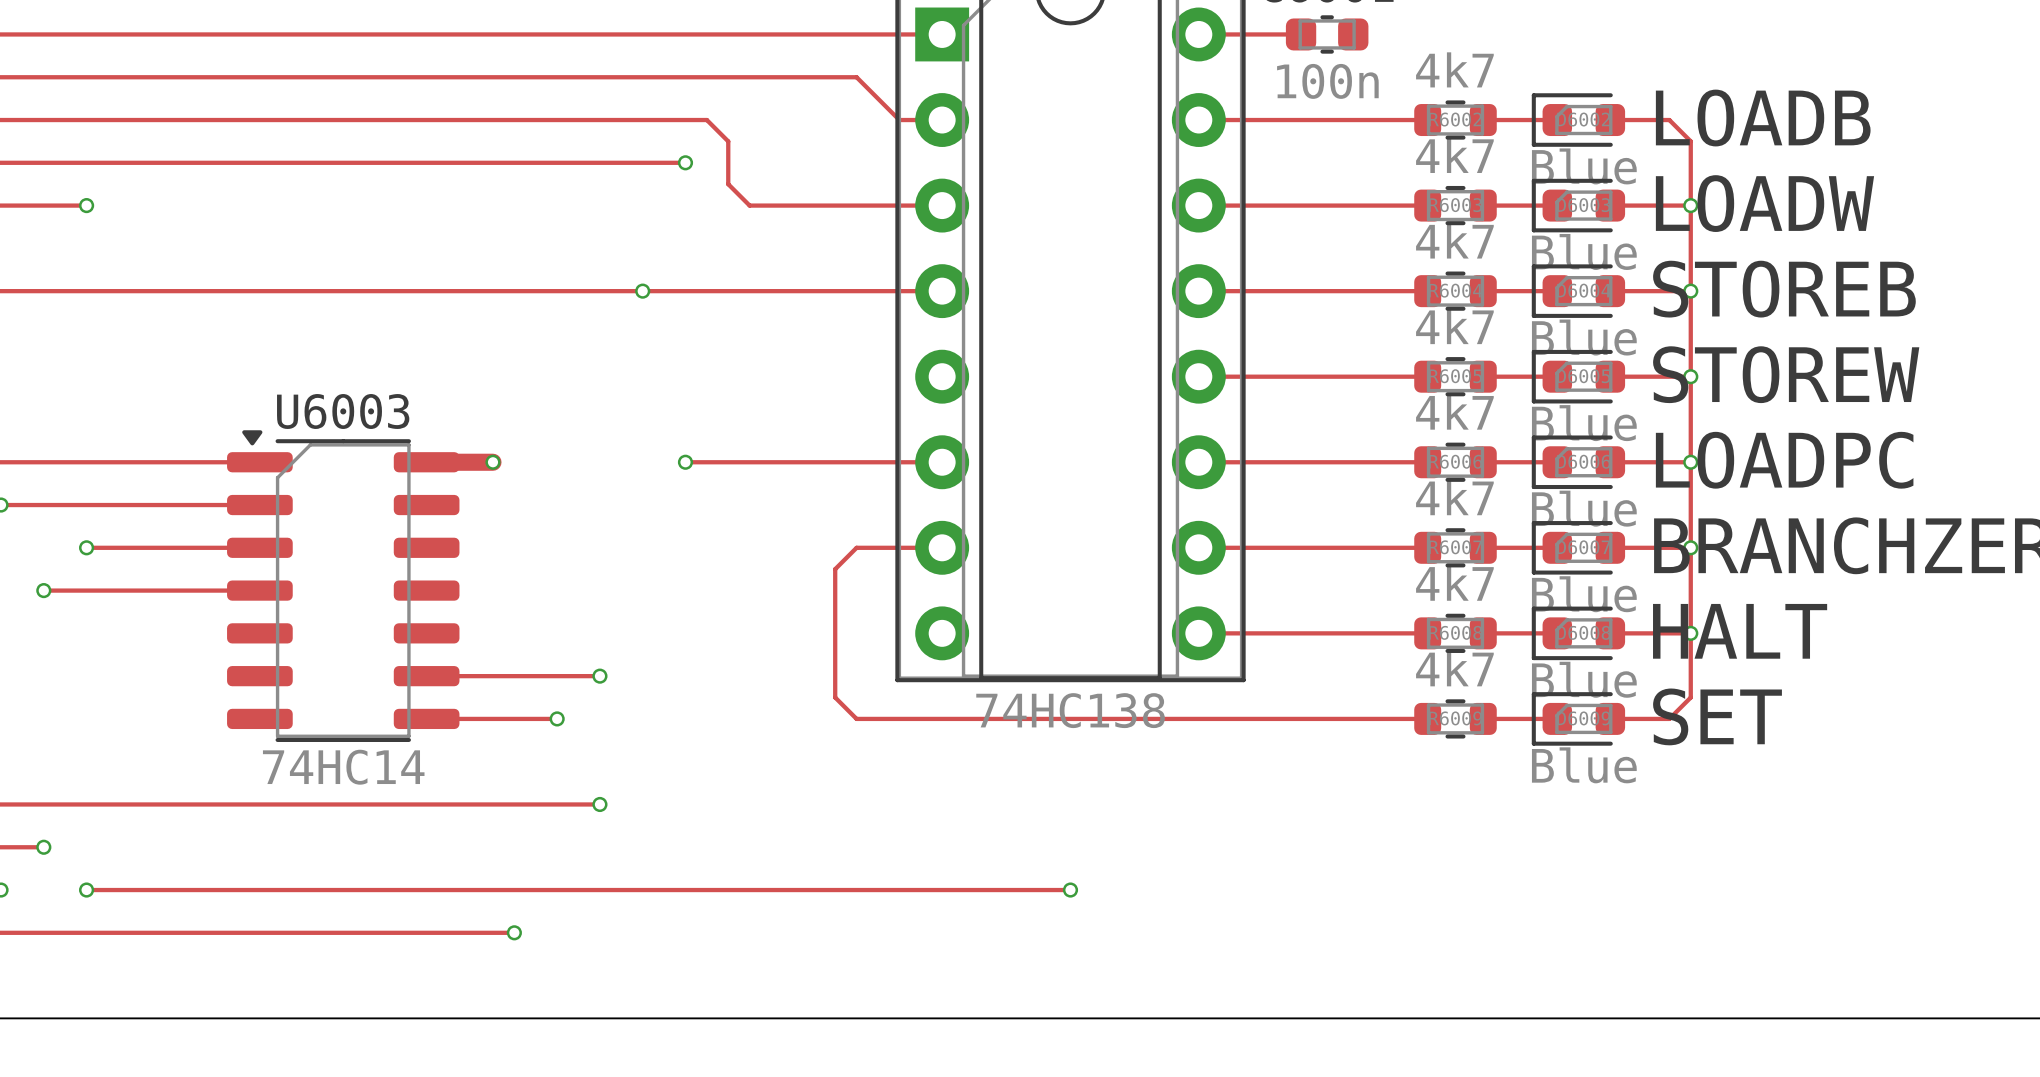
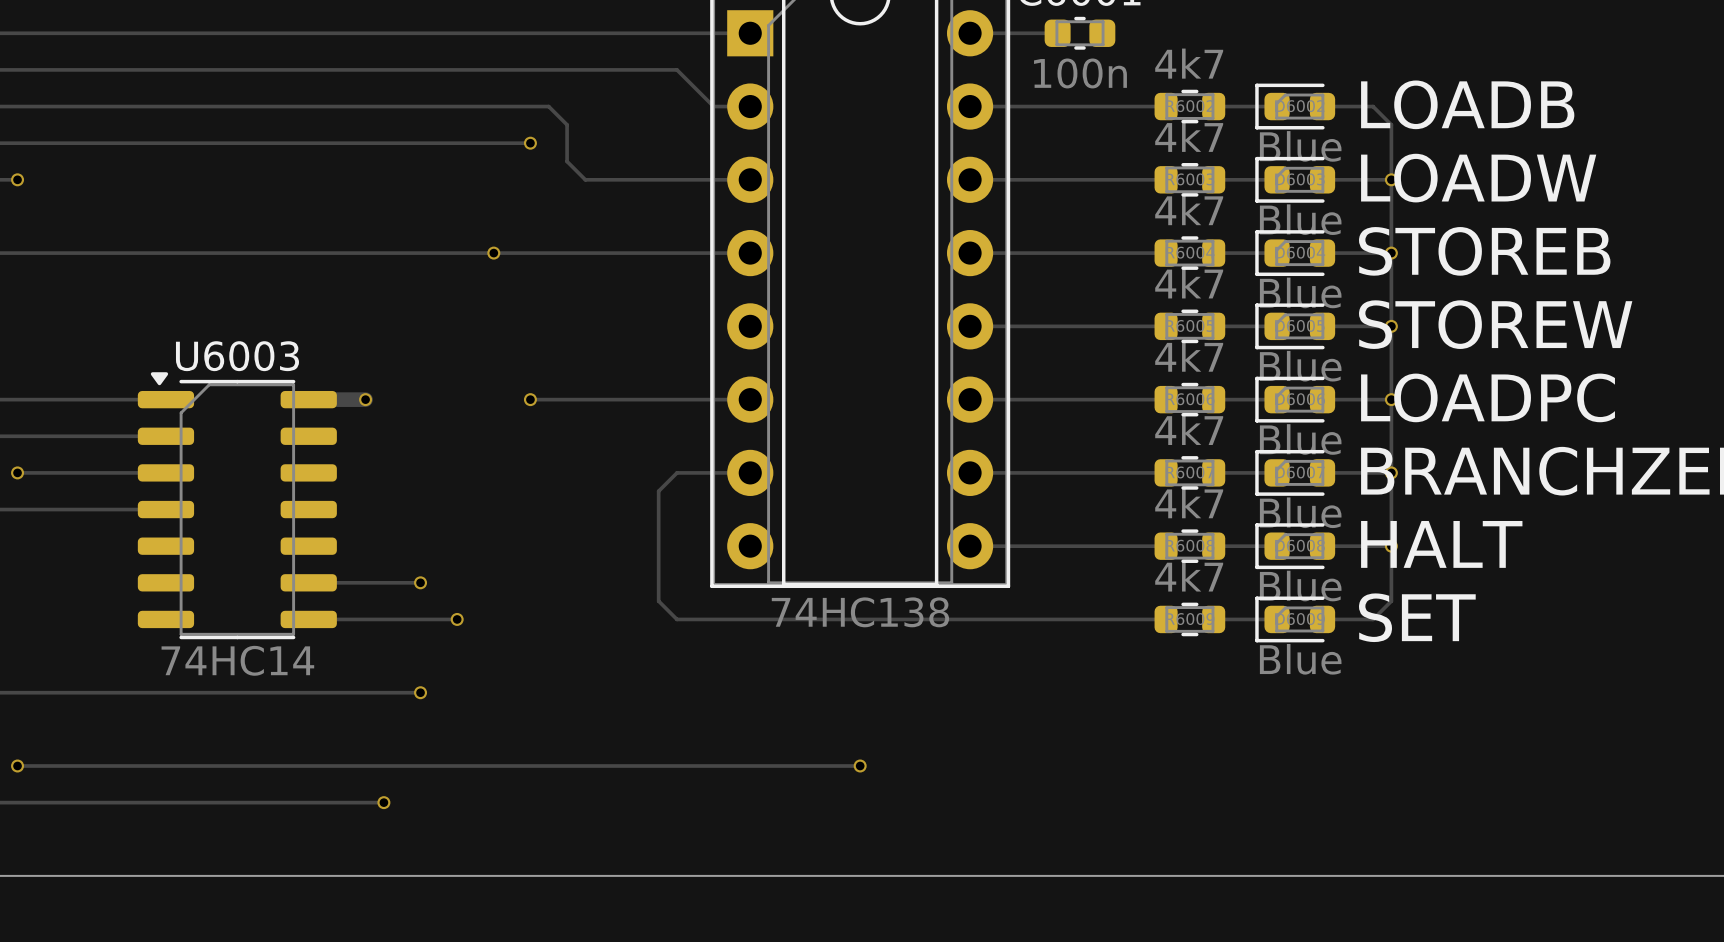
track: (557, 676) (599, 676) -> (420, 619) (457, 619)
via: none -> (420, 582)
via: (599, 676) -> none
via: (557, 718) -> none
via: none -> (457, 619)
track: (557, 804) (599, 804) -> none
via: none -> (420, 692)
via: (599, 804) -> none

